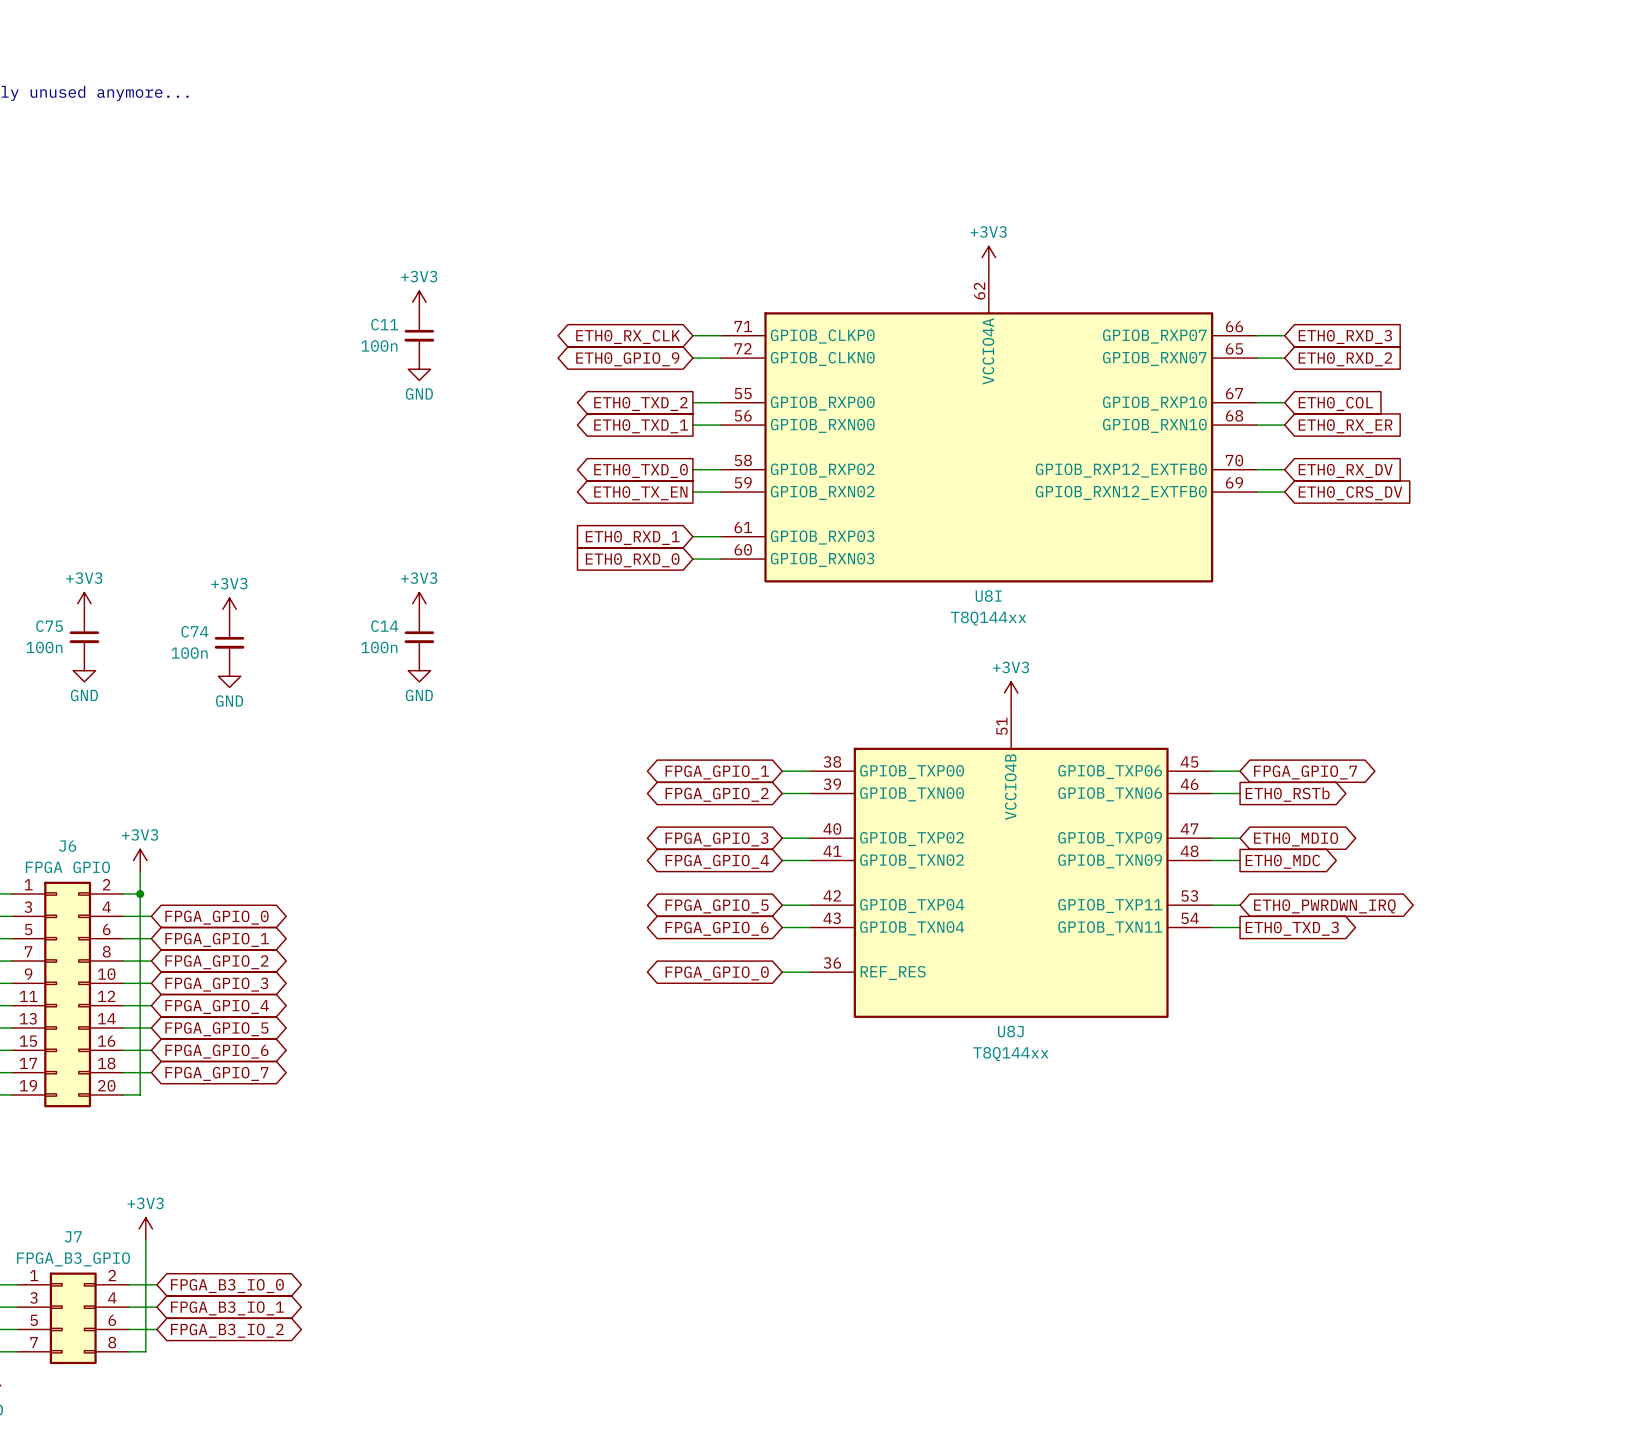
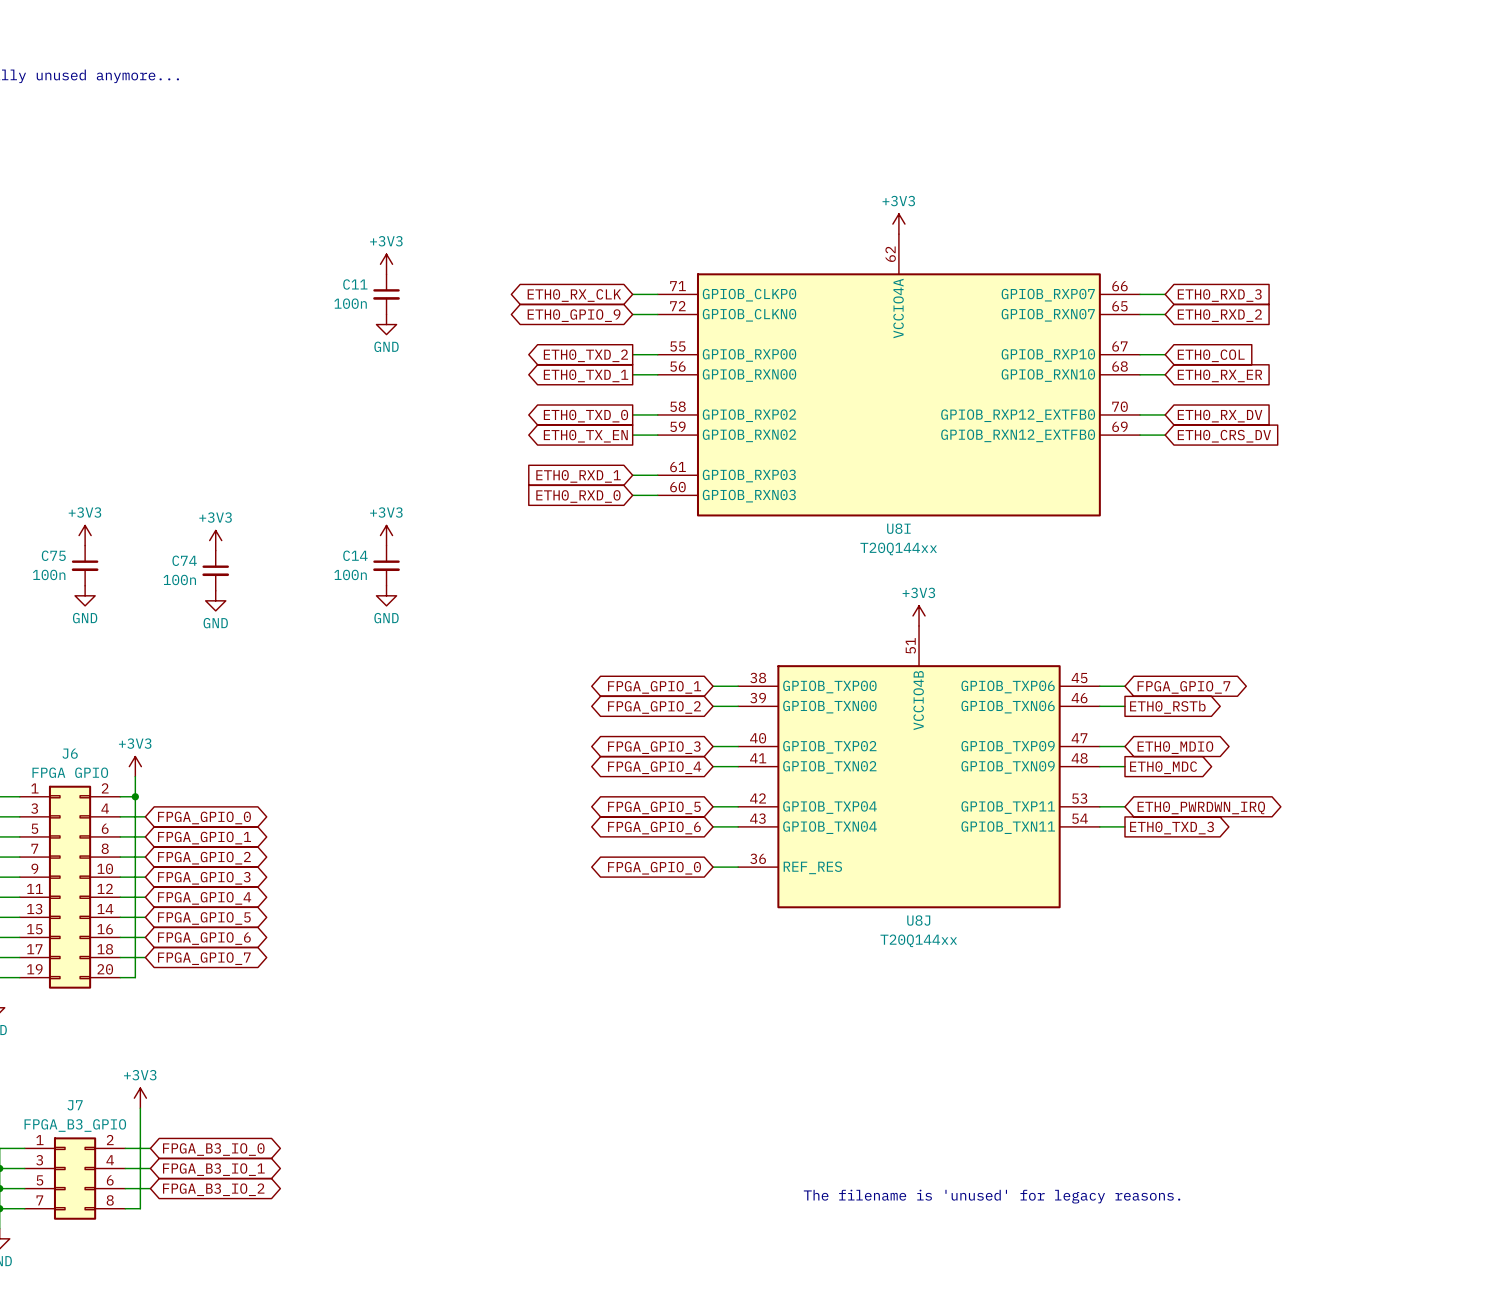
U8I value: T8Q144xx (988, 618) -> T20Q144xx (898, 548)
U8J value: T8Q144xx (1010, 1054) -> T20Q144xx (918, 940)
text: none -> The filename is 'unused' for legacy reasons. (992, 1196)

